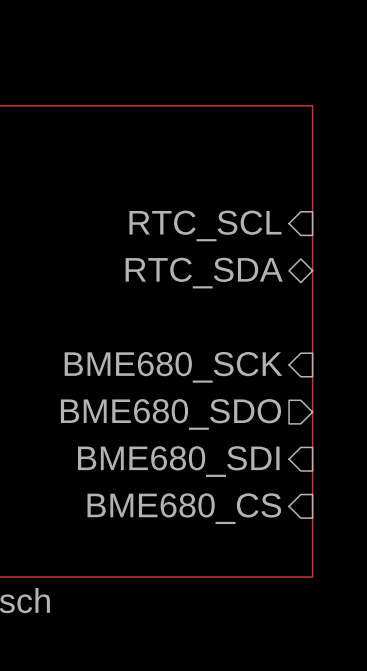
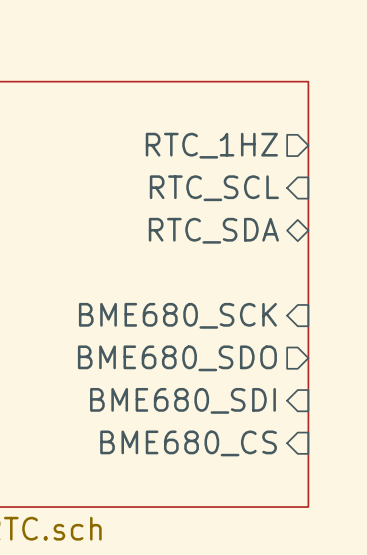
sheet pin: none -> RTC_1HZ (211, 145)

